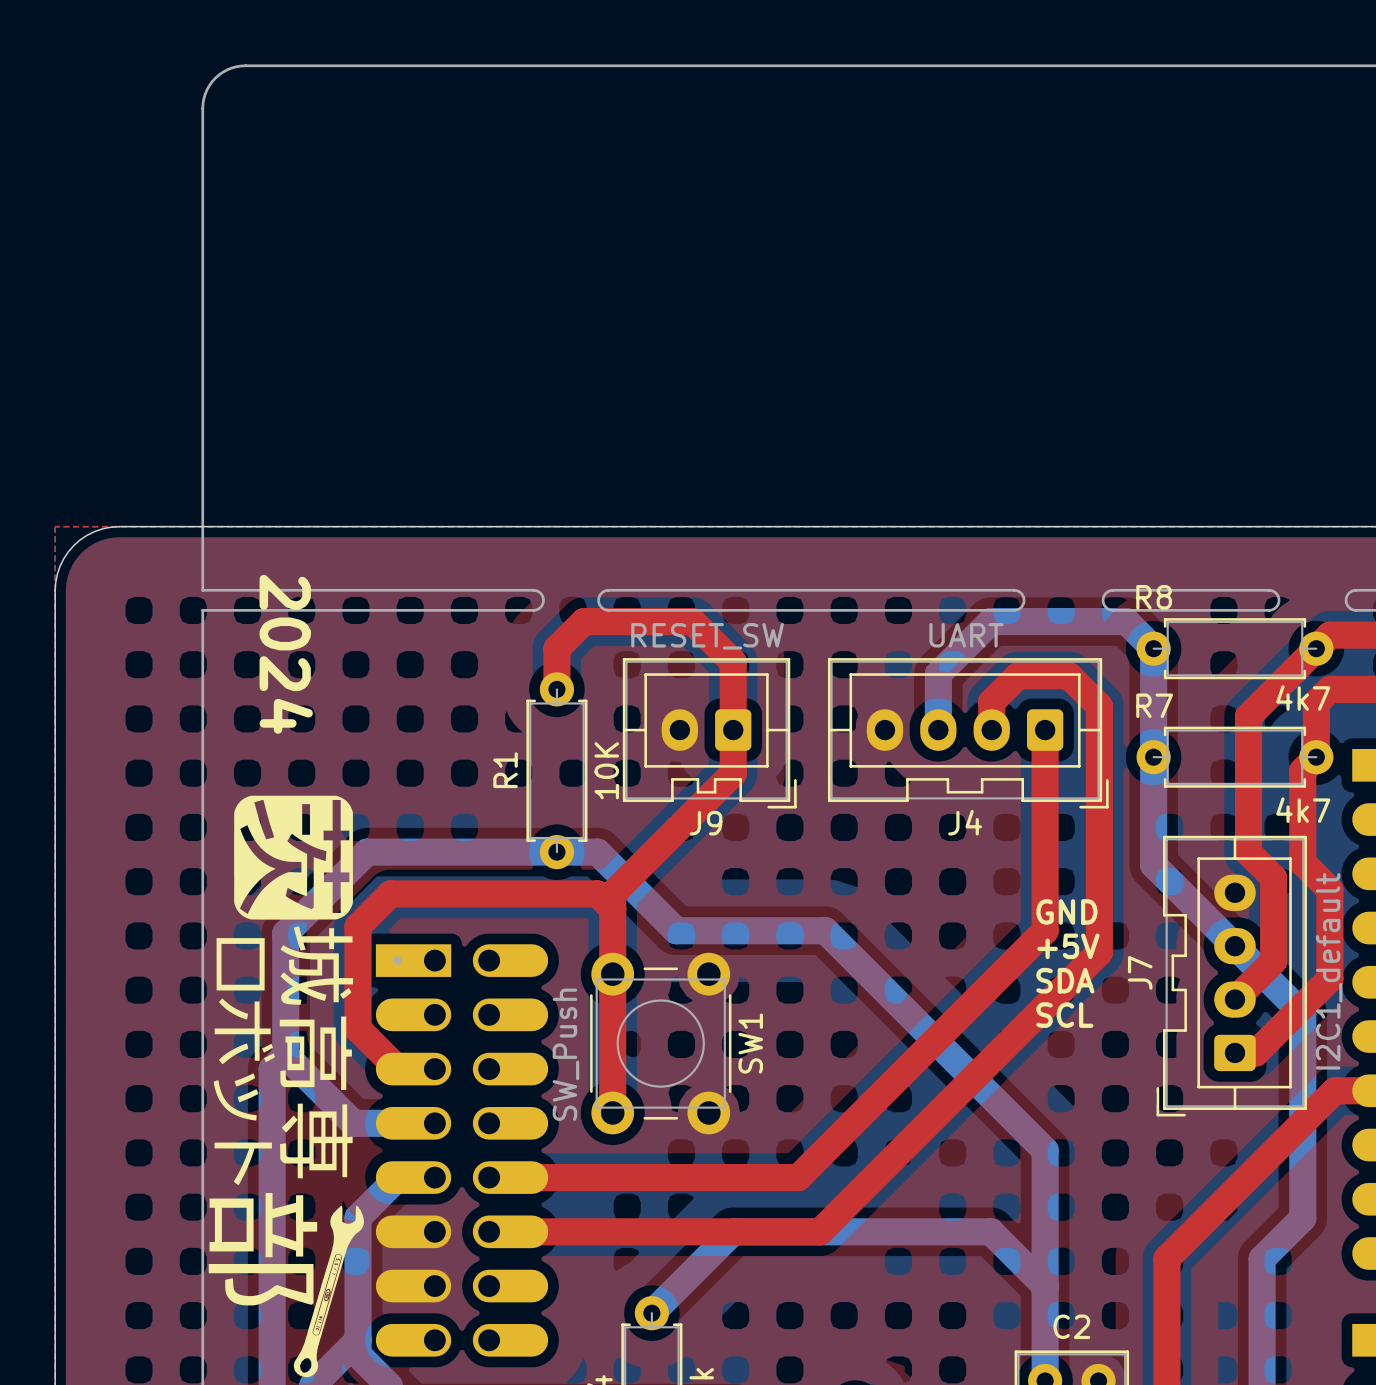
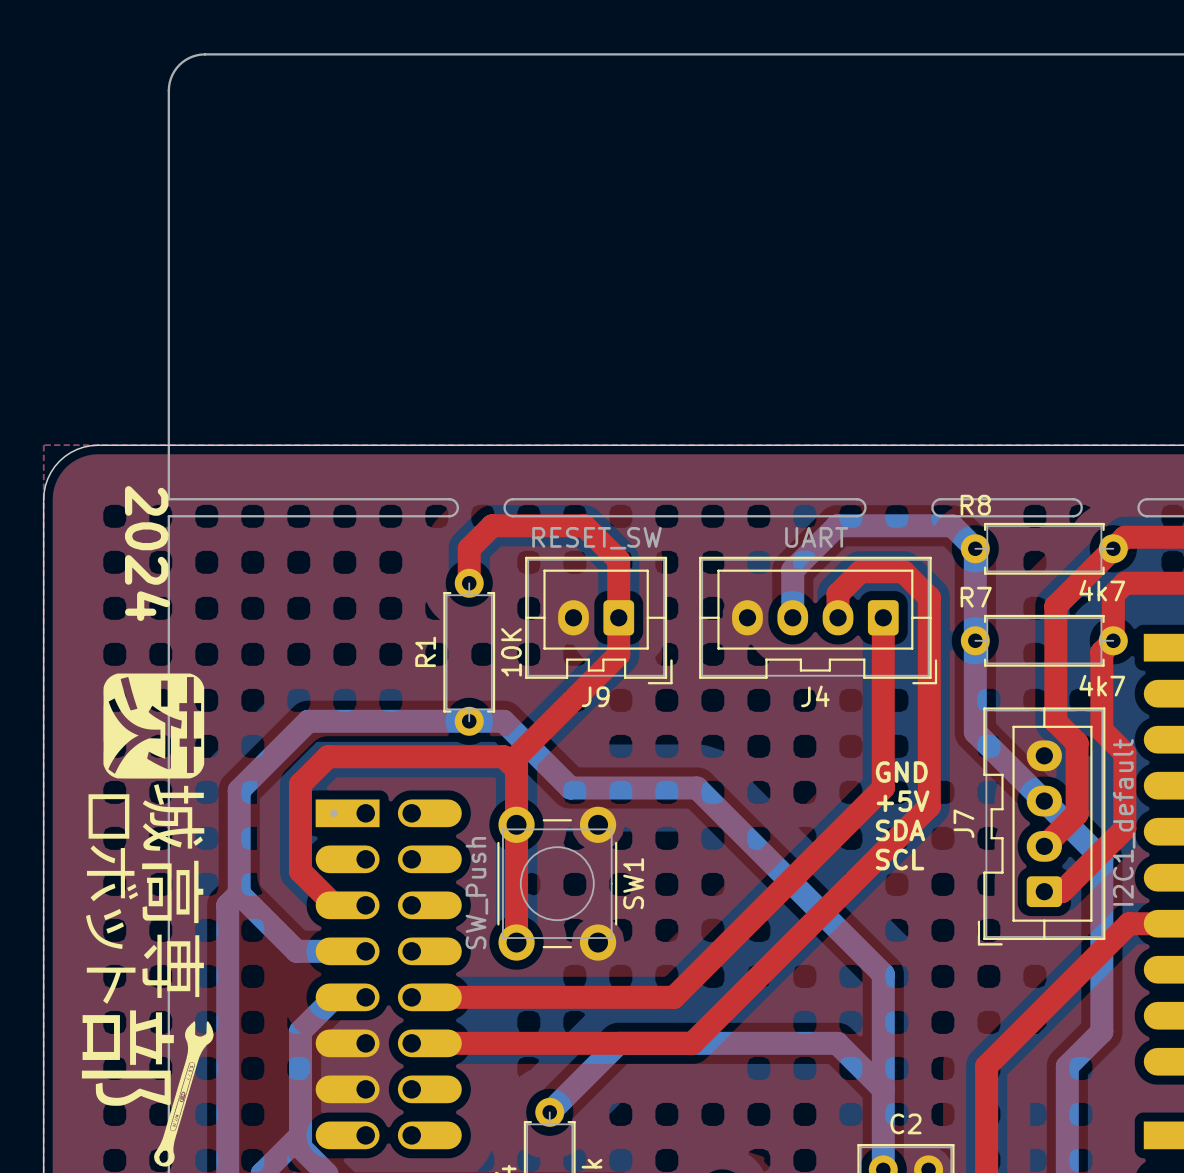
text position: 2024 (286, 654) -> 2024 (147, 553)
drawing position: (286, 1086) -> (147, 920)

